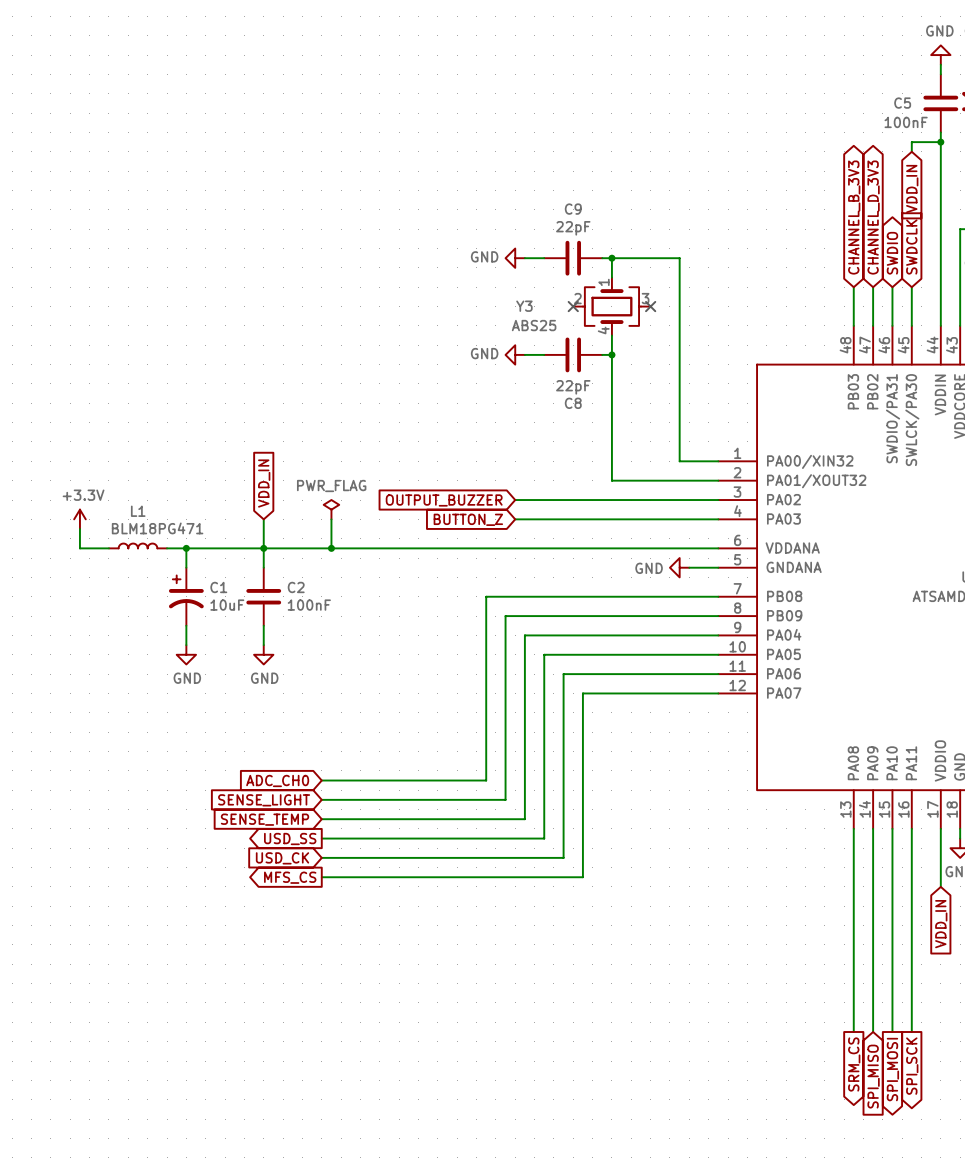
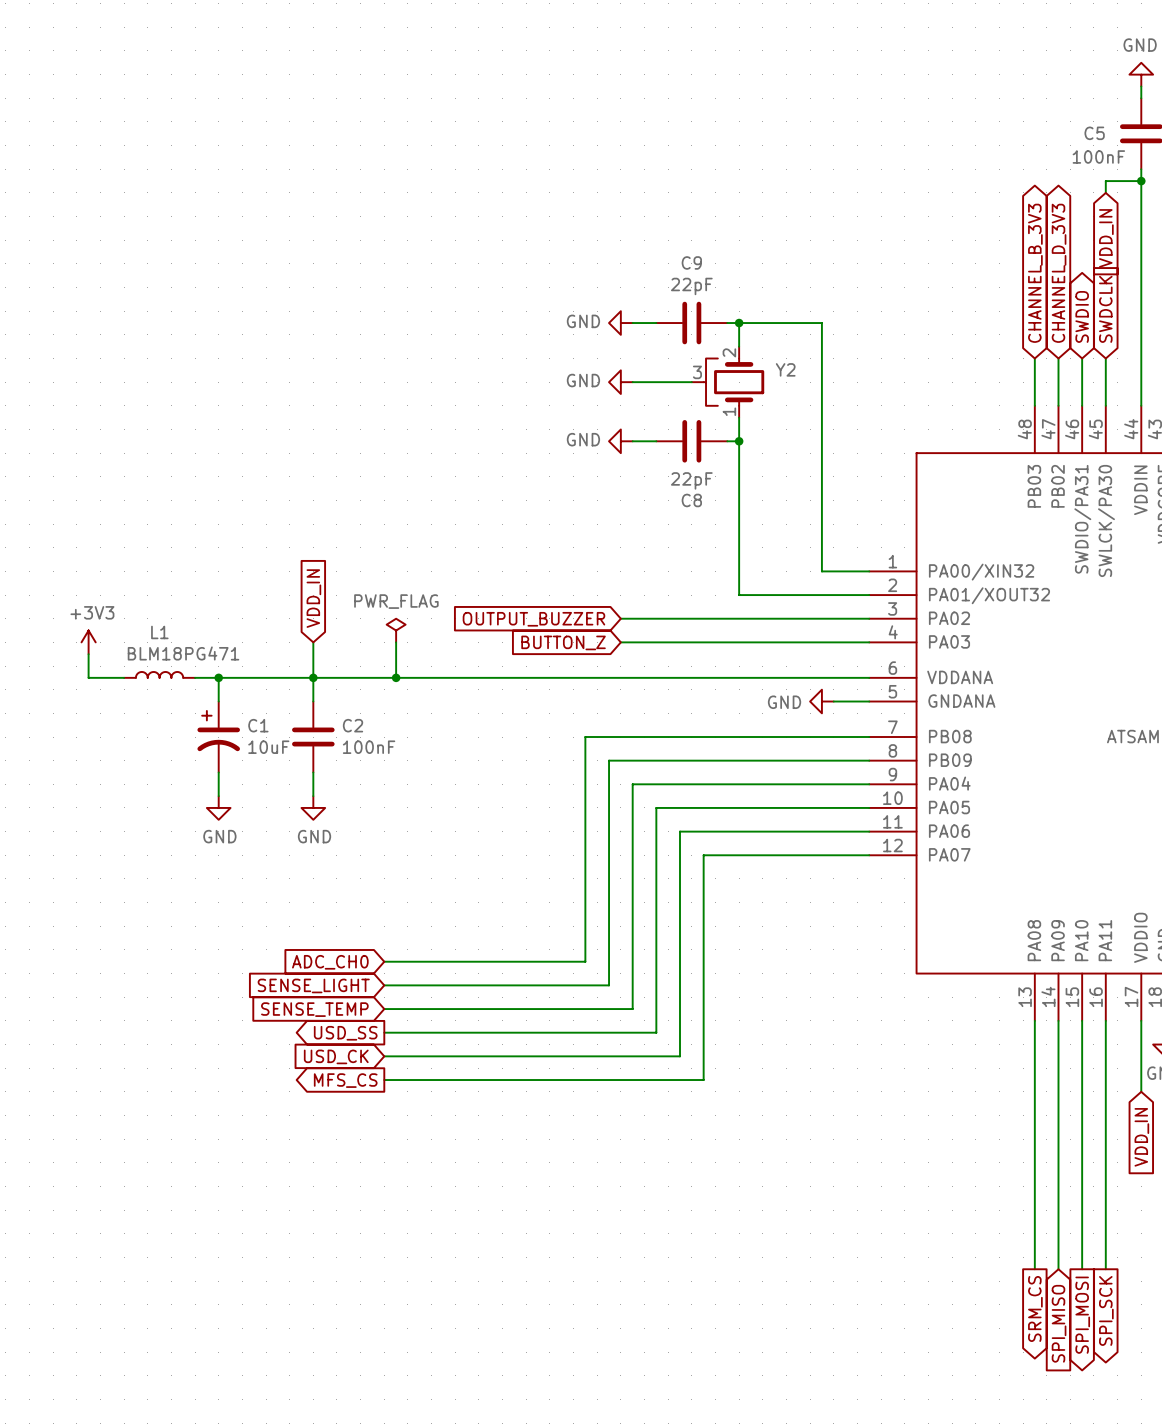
power symbol: none -> GND (620, 382)
wire: none -> (632, 382) (691, 382)
no-connect mark: (573, 306) -> none
Y2: none -> (728, 382)
Y3: ABS25 (611, 306) -> none
no-connect mark: (650, 306) -> none
power symbol: +3.3V (79, 519) -> +3V3 (88, 642)

